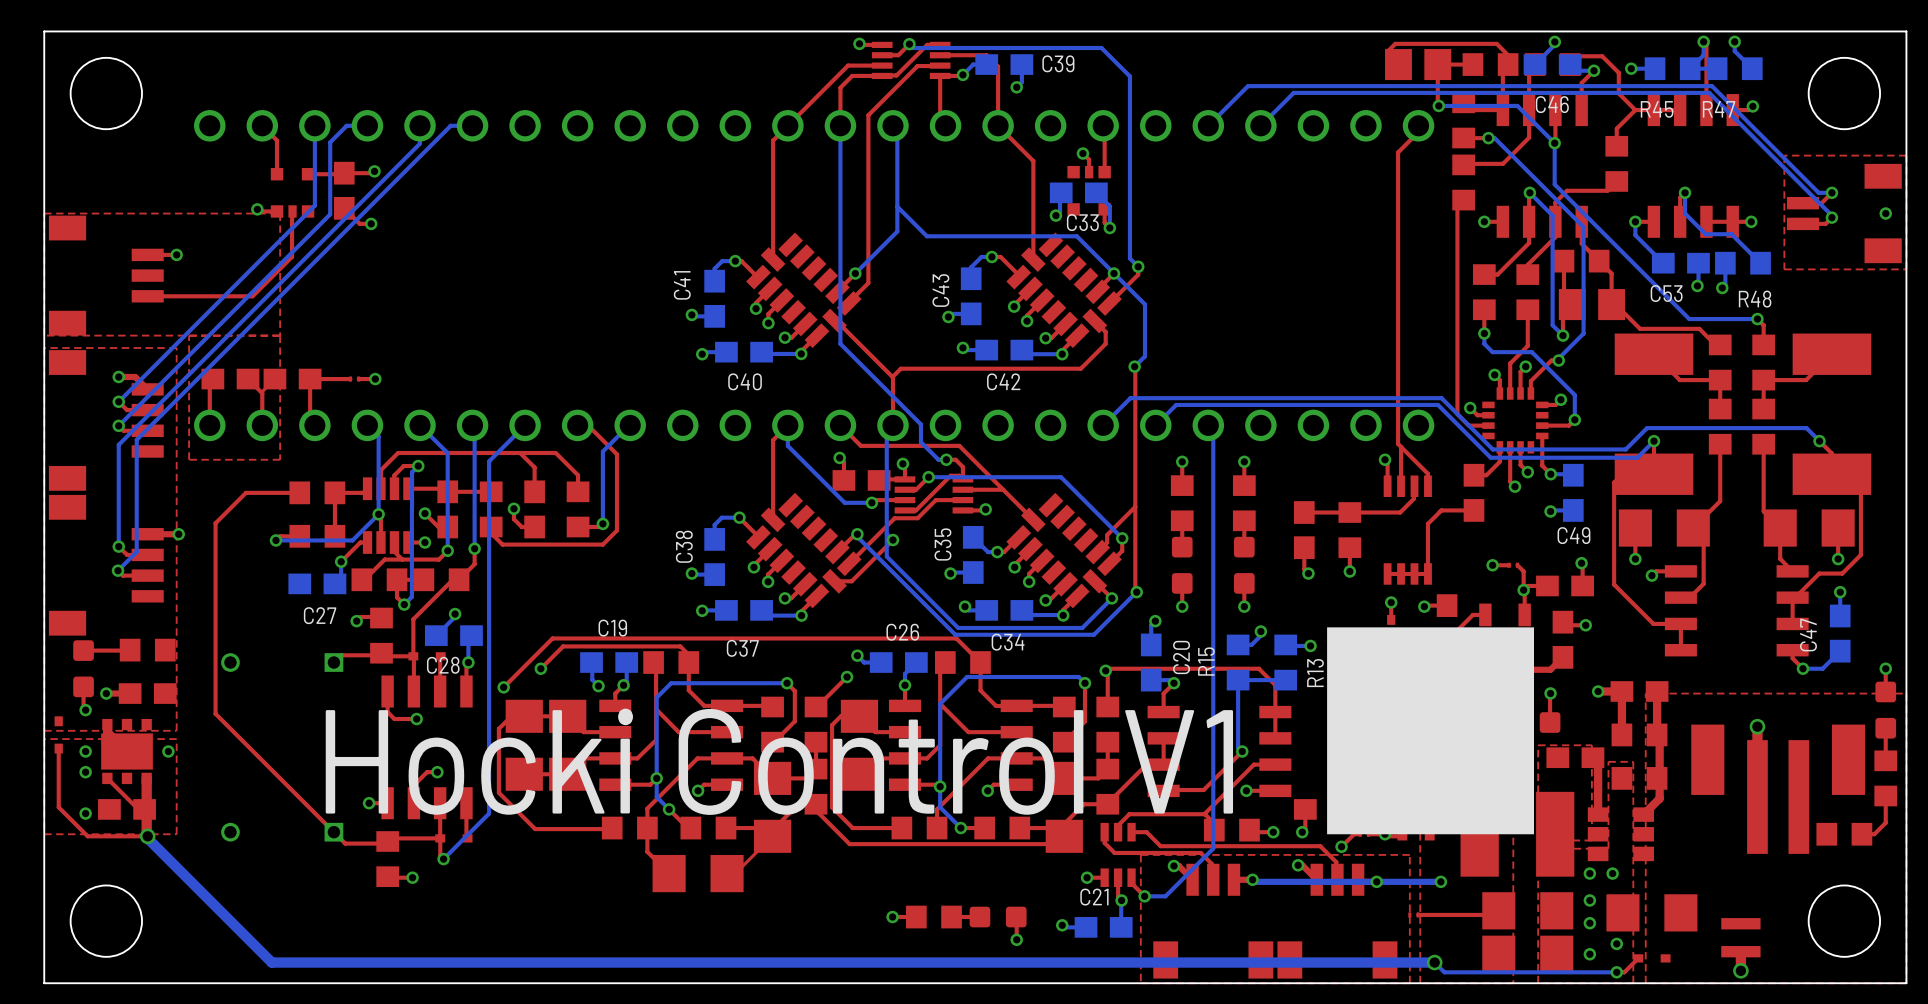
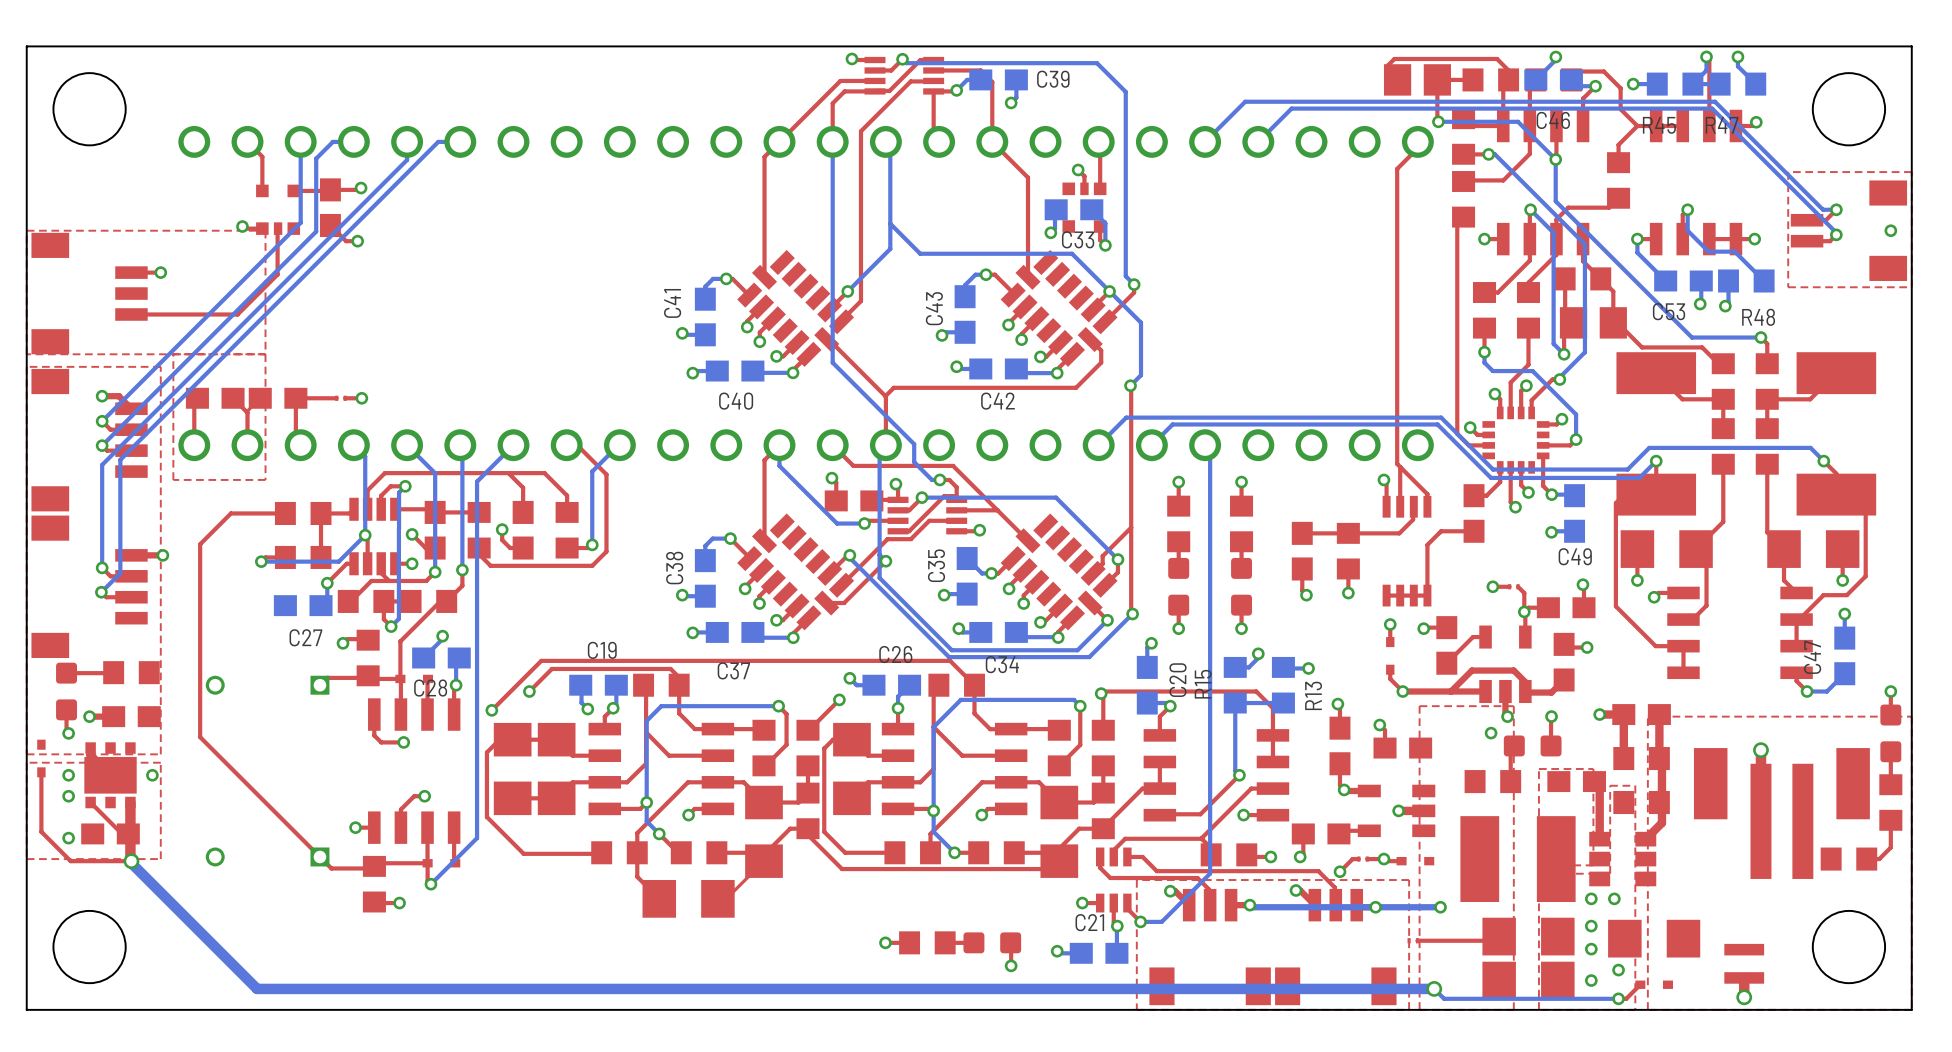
drawing: [1327, 627, 1534, 835] -> none
text: Hocki Control V1 (779, 761) -> none

